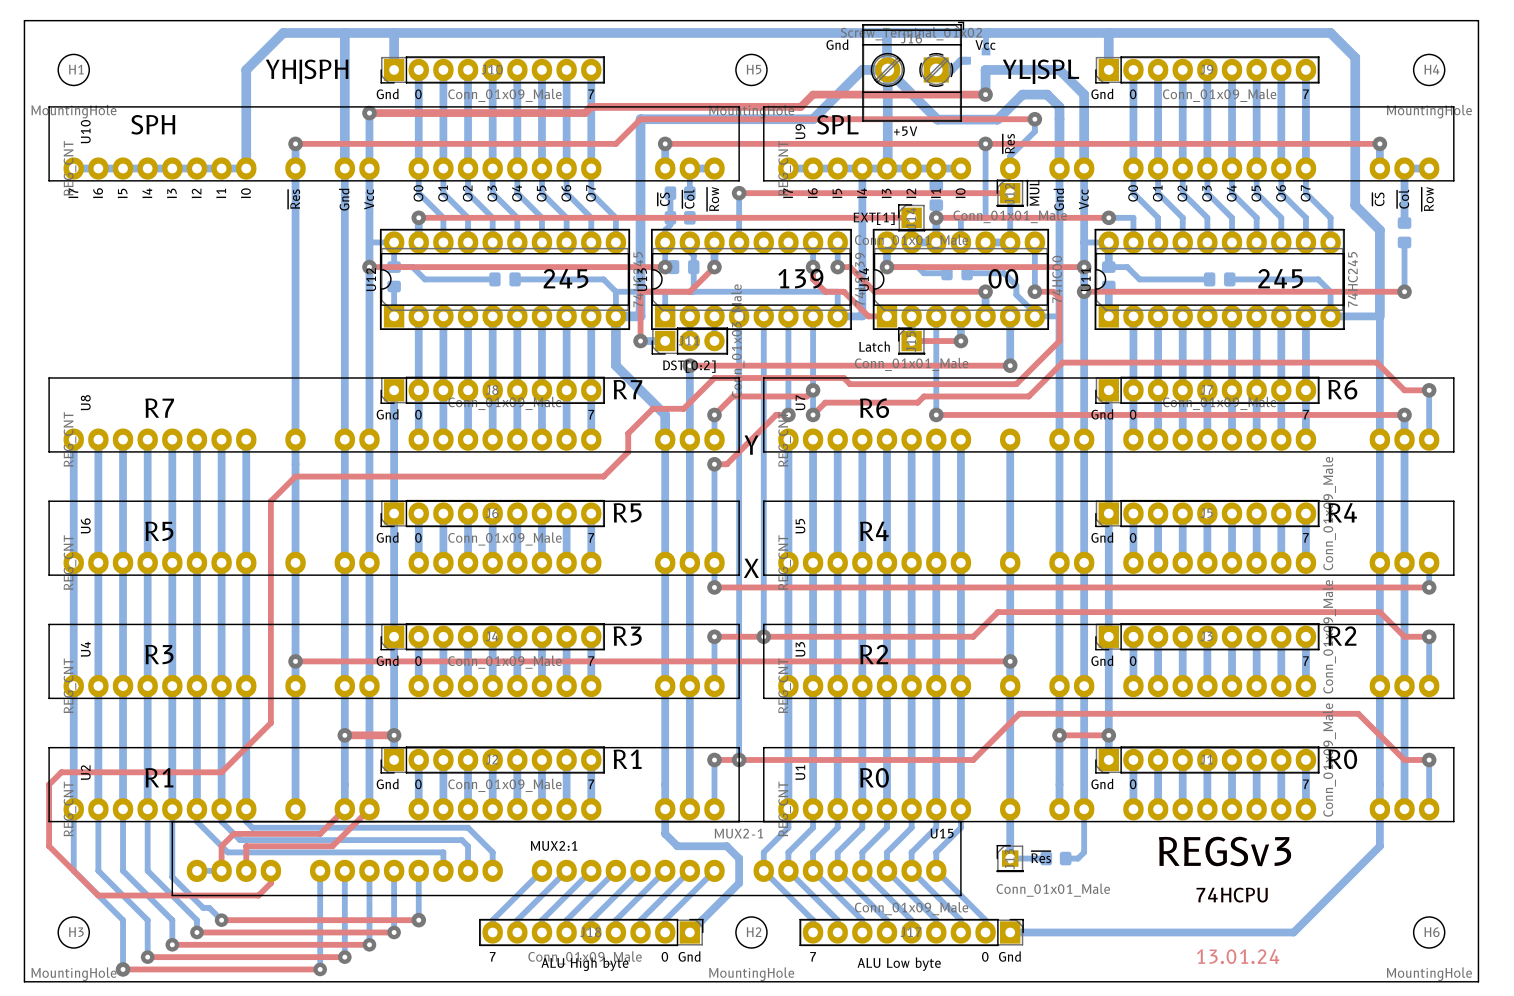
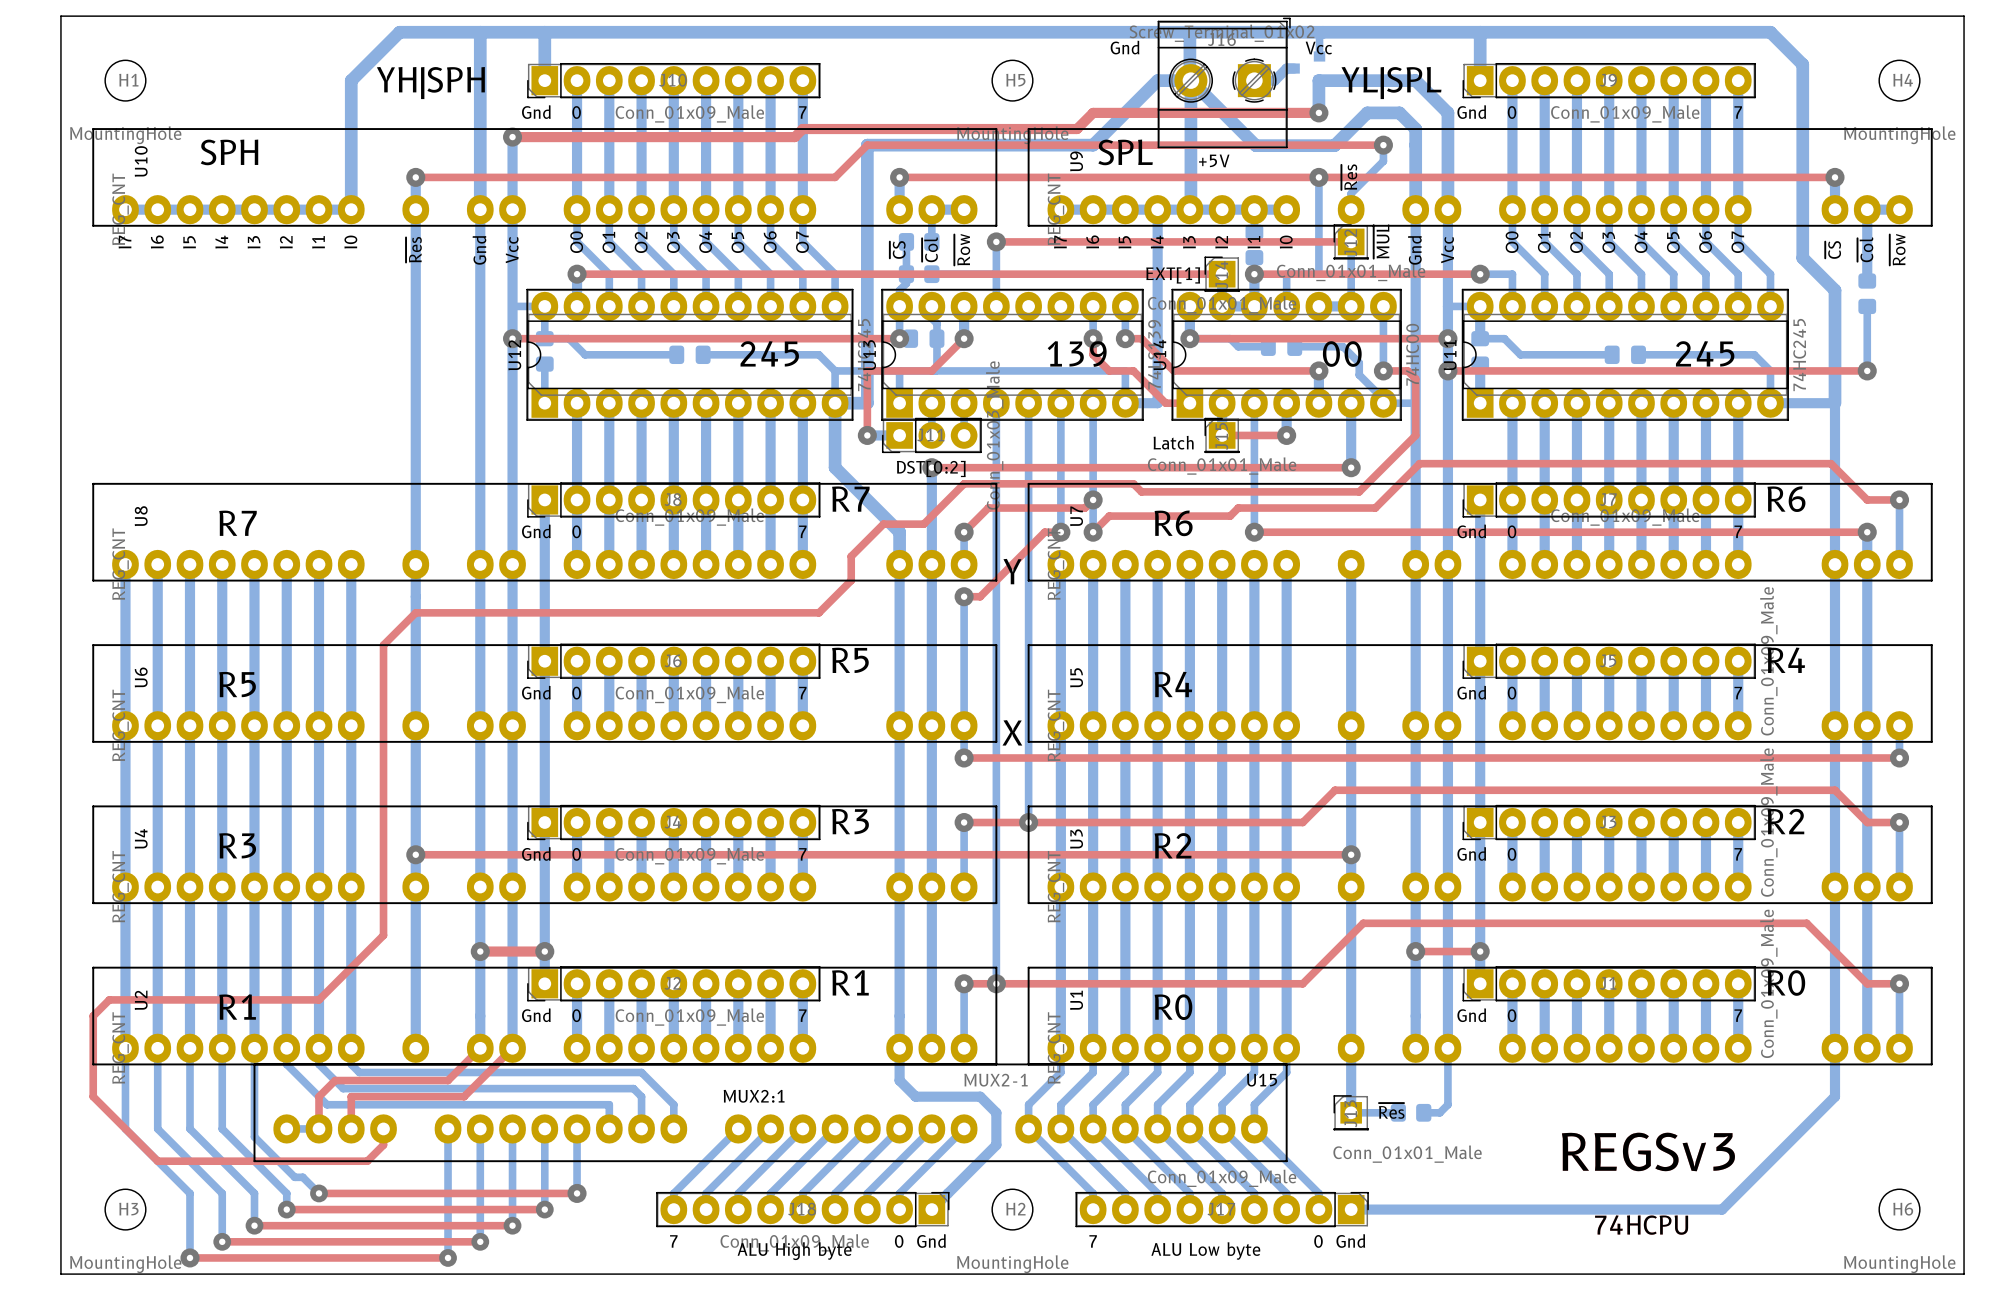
text: REGSv3 (1225, 851) -> none
text: none -> REGSv3 (1648, 1151)
text: 74HCPU (1232, 895) -> none
text: none -> 74HCPU (1641, 1225)
text: 13.01.24 (1238, 956) -> none

